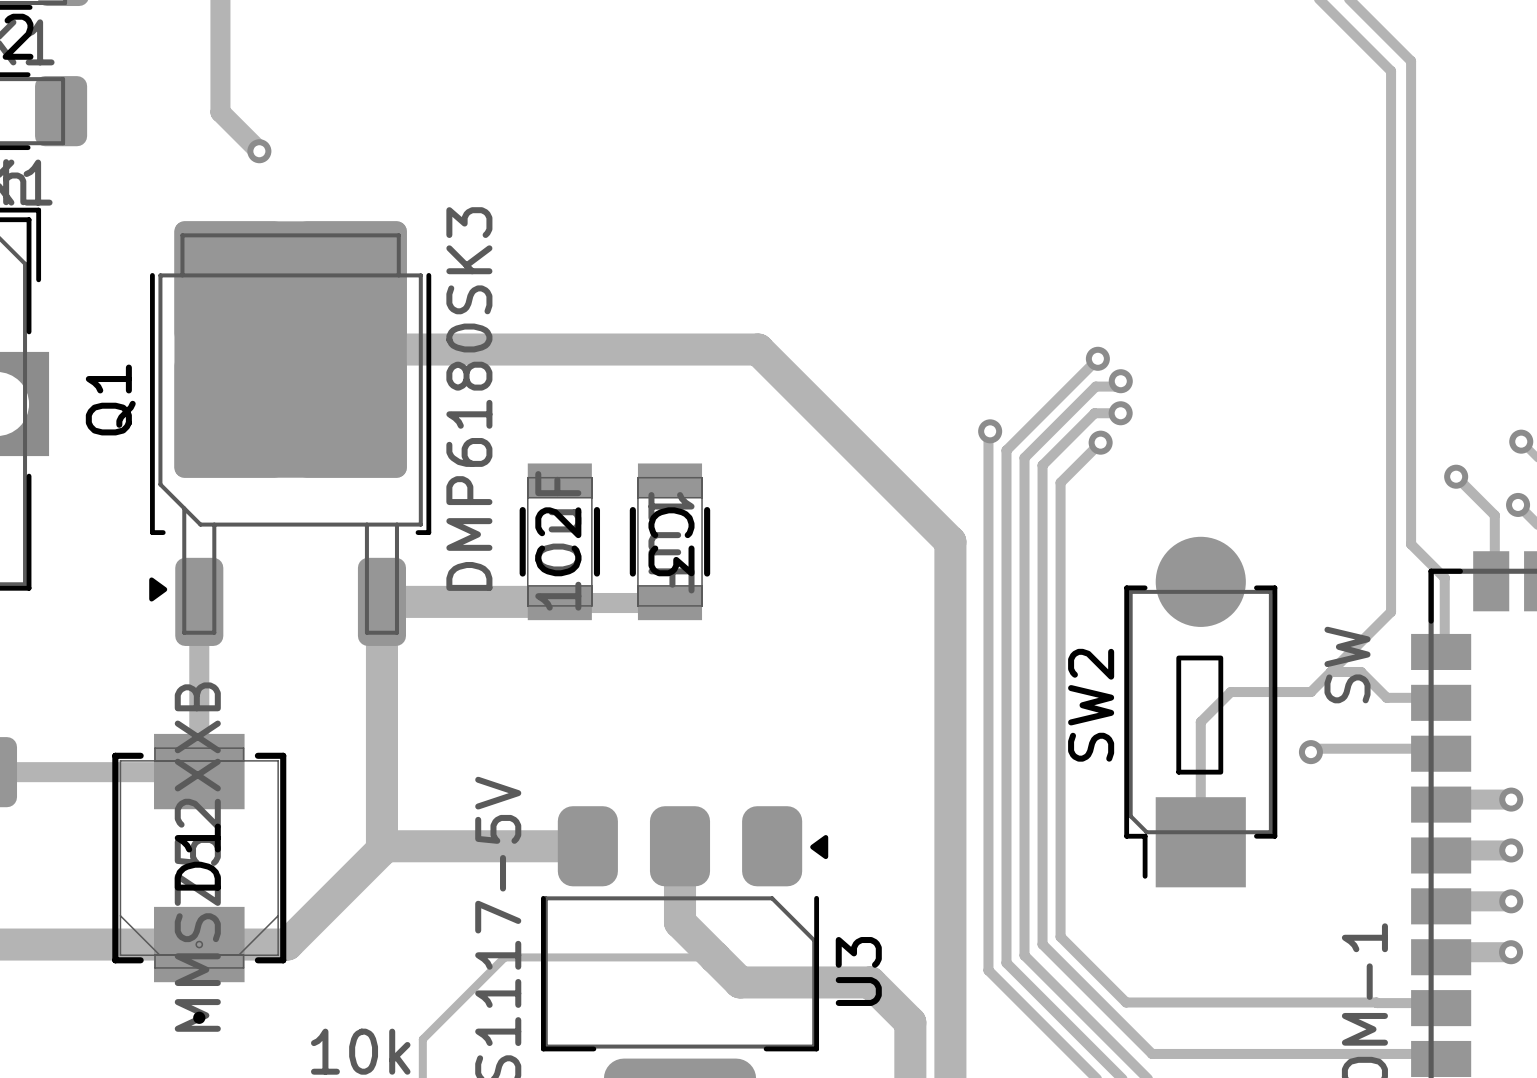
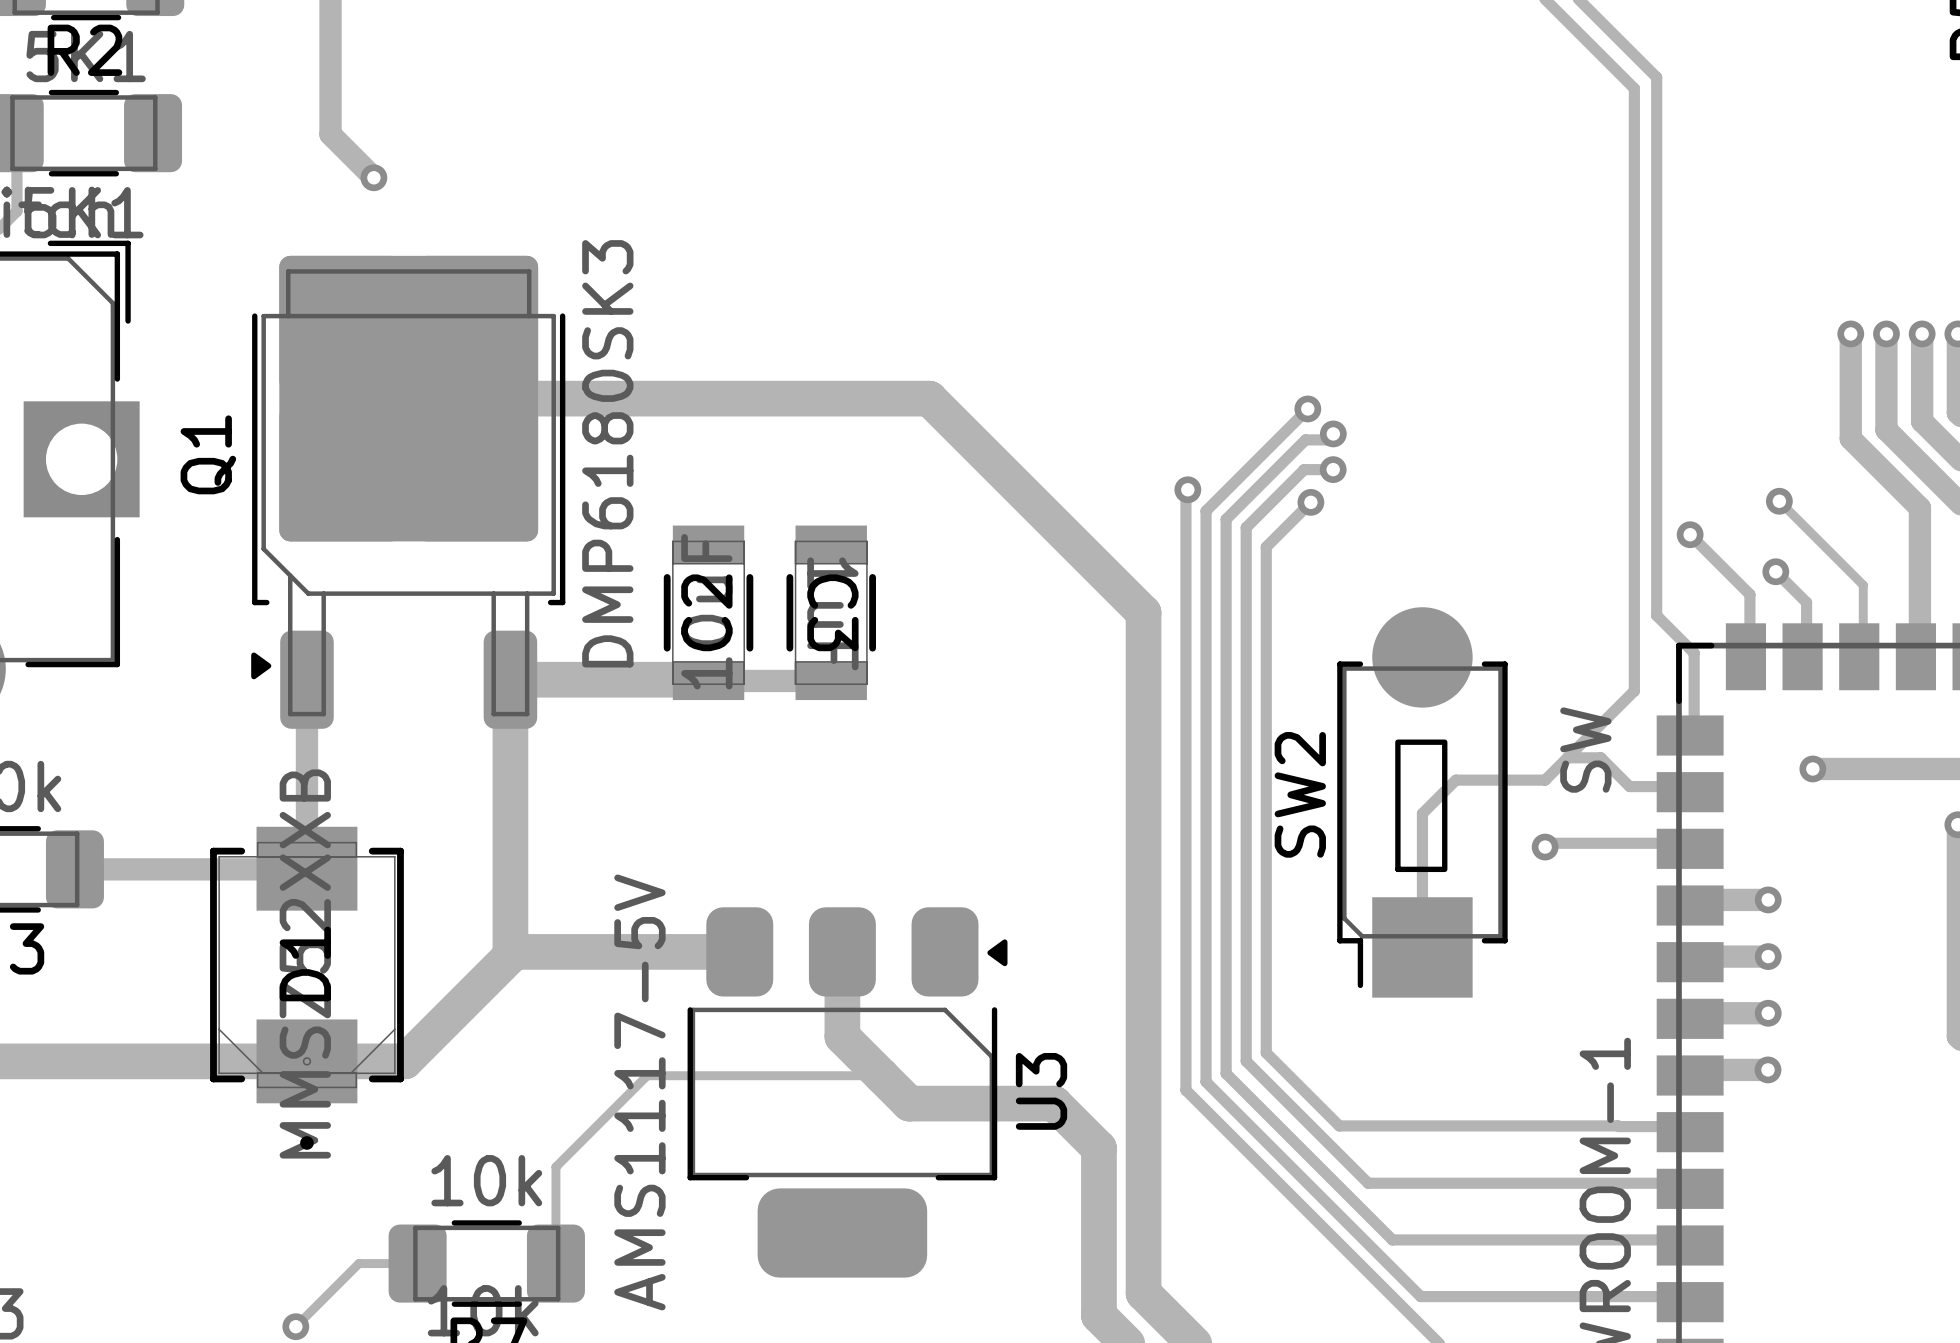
track: (1456, 476) (1494, 515) (1494, 525) -> (1690, 534) (1749, 594)
via position: (1456, 476) -> (1690, 534)

